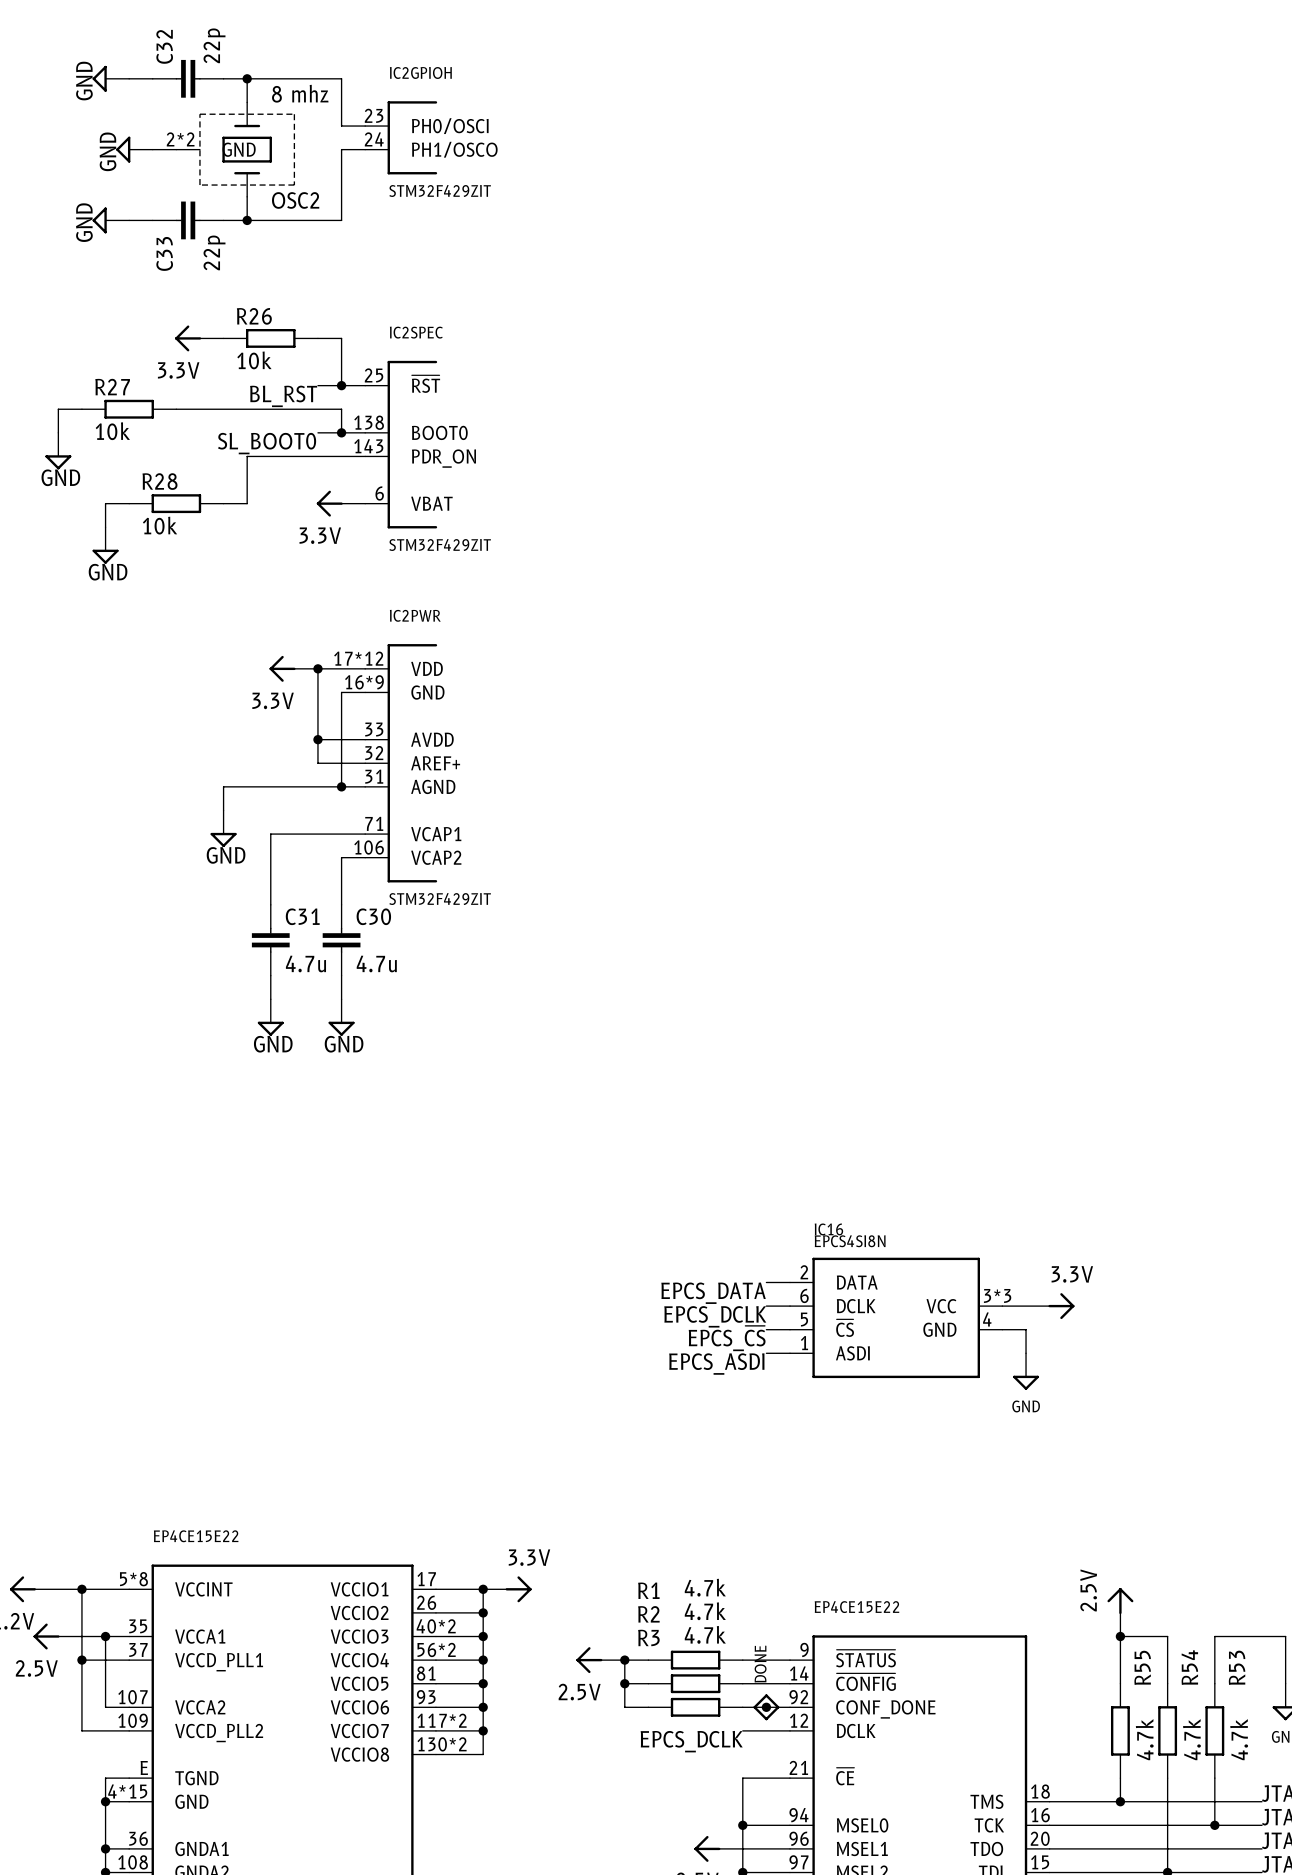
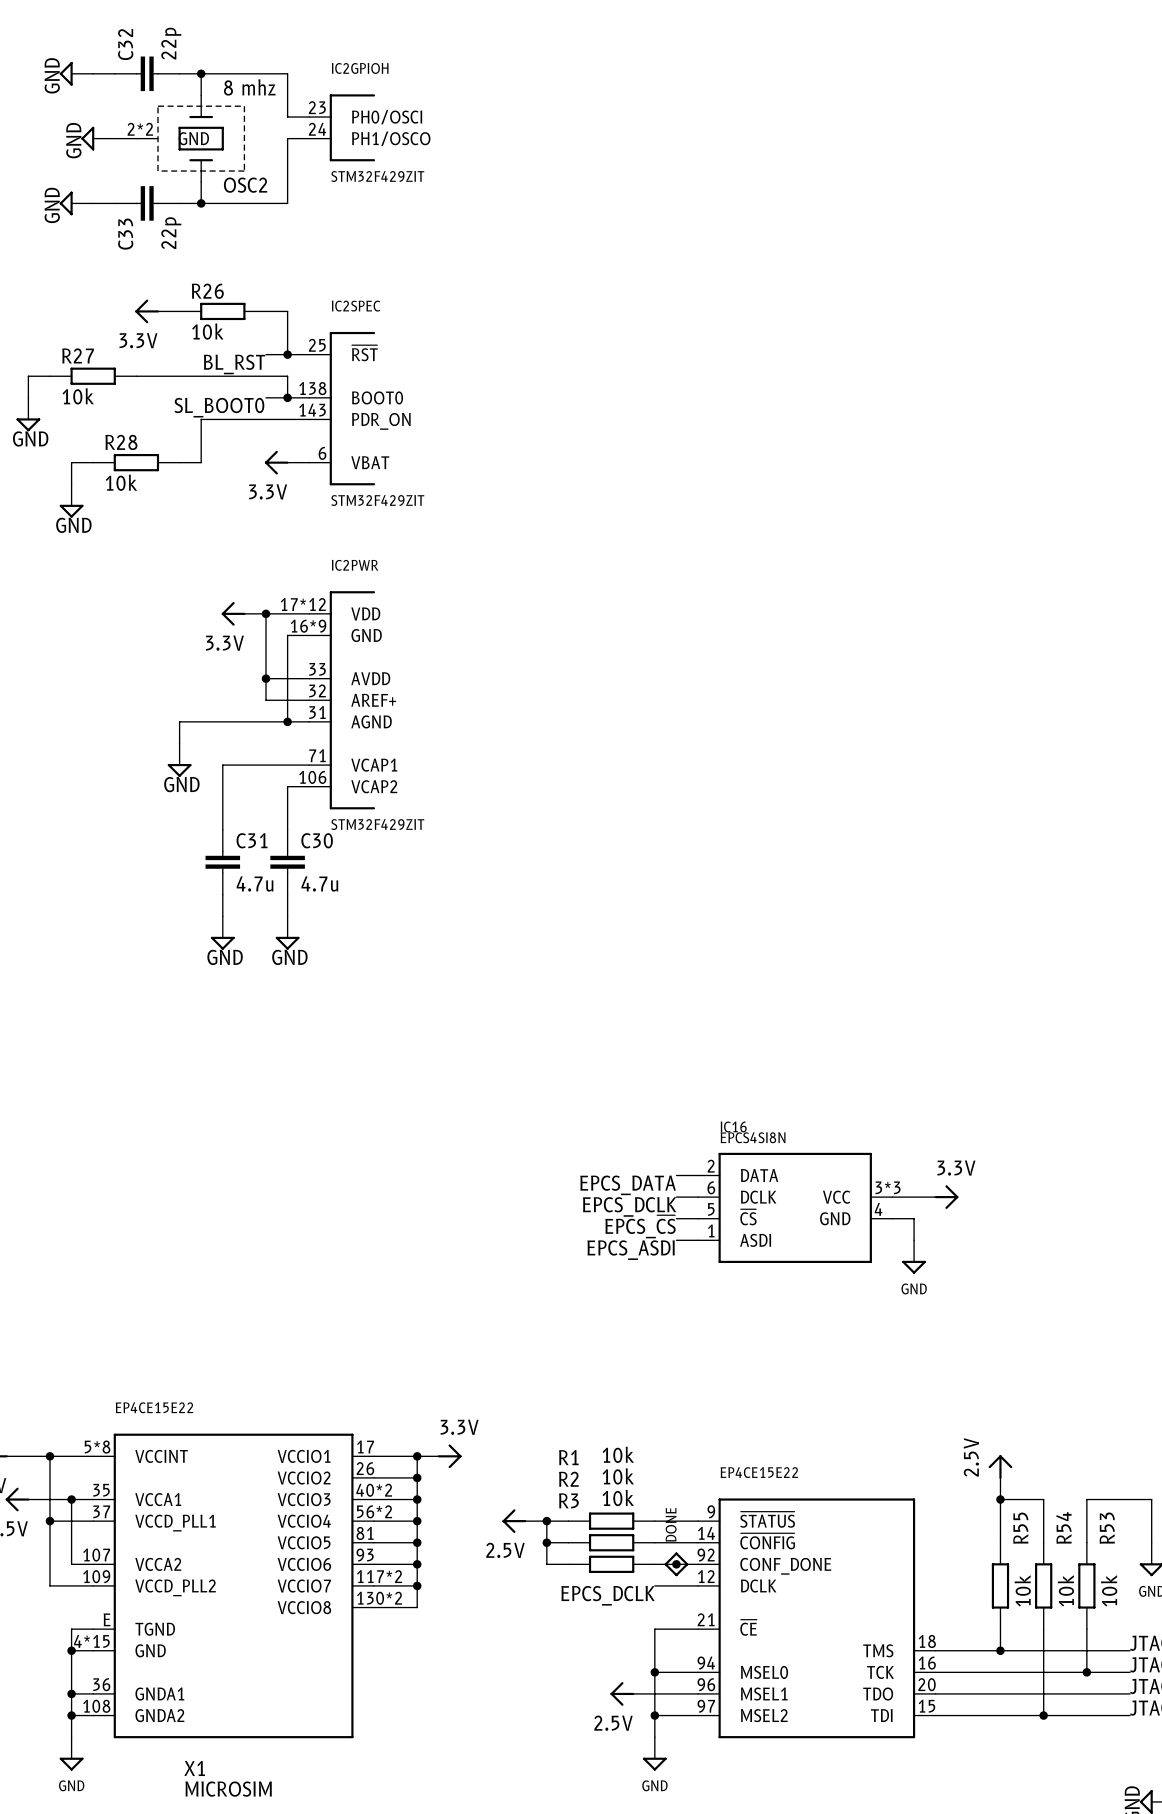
R1 value: 4.7k (705, 1587) -> 10k (618, 1454)
R2 value: 4.7k (705, 1611) -> 10k (618, 1476)
R3 value: 4.7k (705, 1634) -> 10k (618, 1498)
R55 value: 4.7k (1144, 1739) -> 10k (1022, 1590)
R54 value: 4.7k (1191, 1739) -> 10k (1065, 1590)
R53 value: 4.7k (1239, 1739) -> 10k (1109, 1590)

